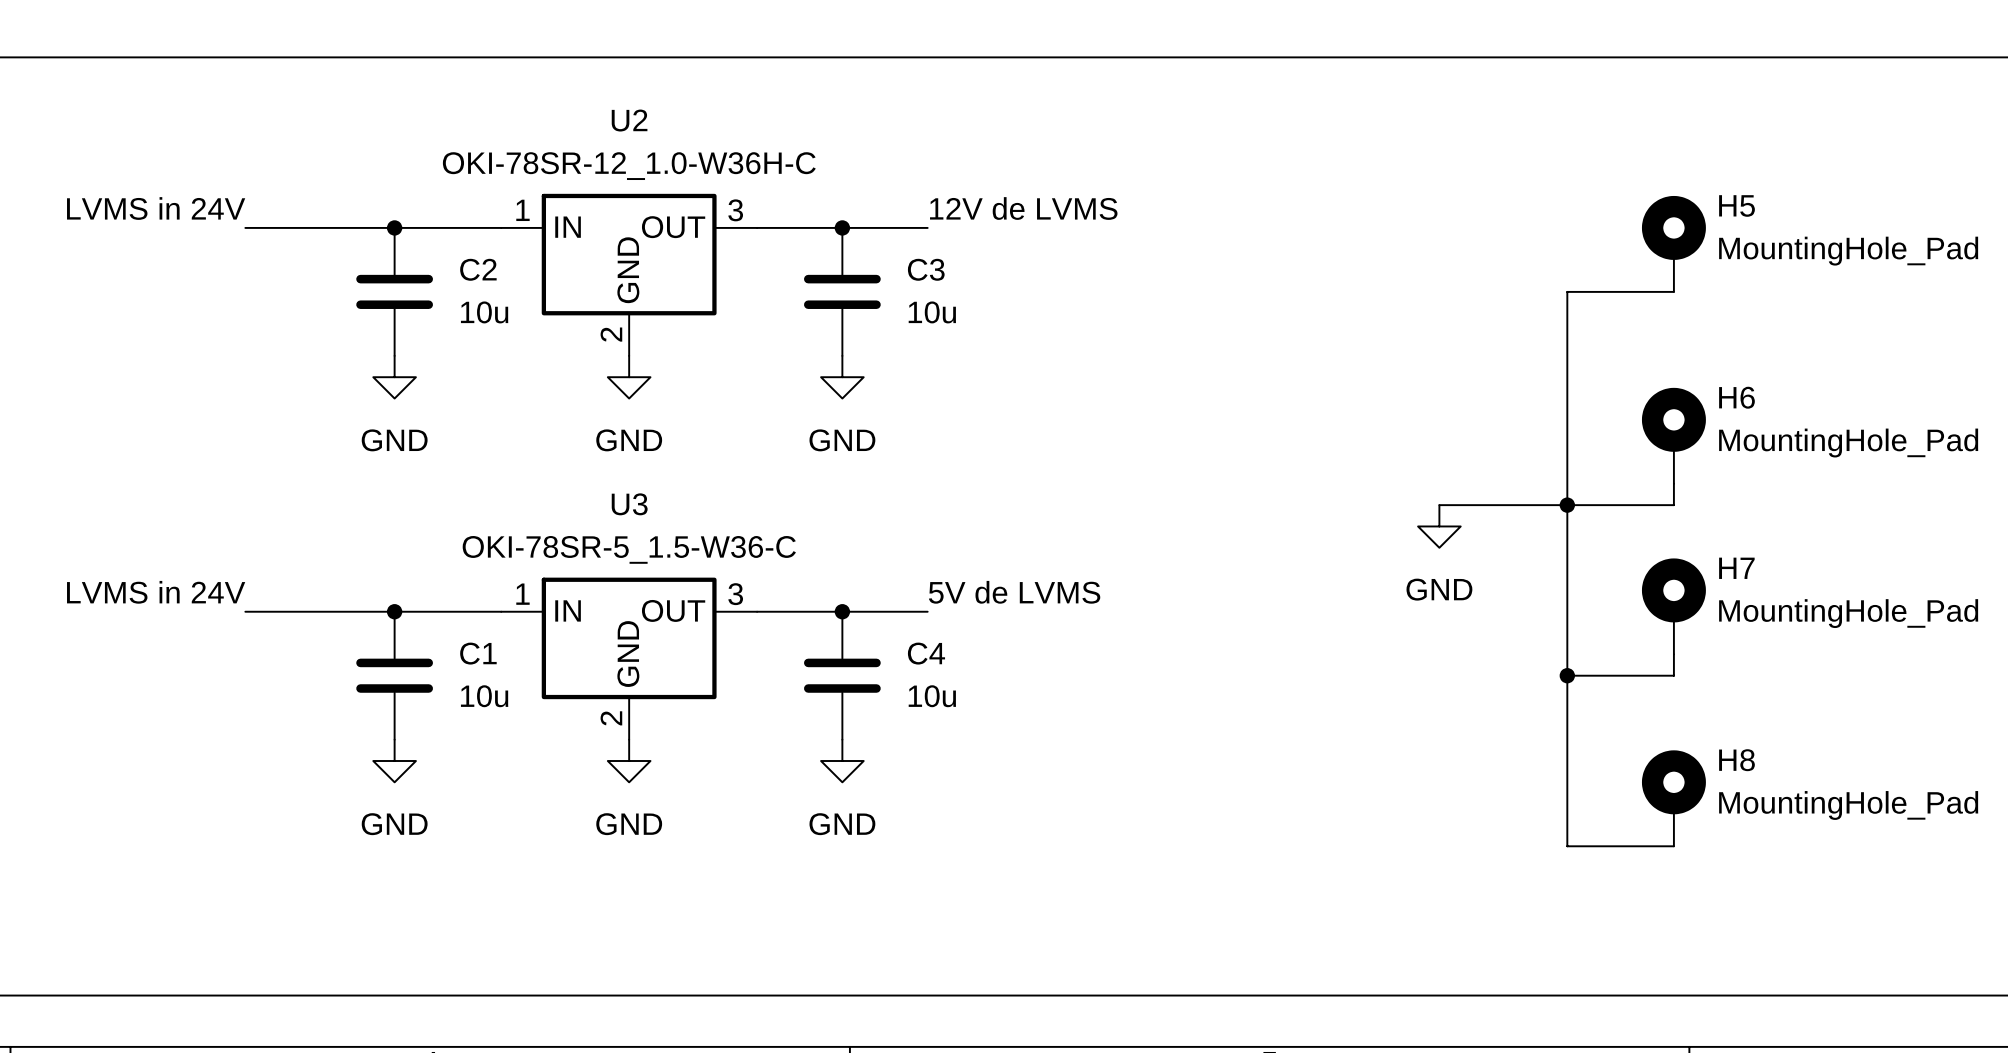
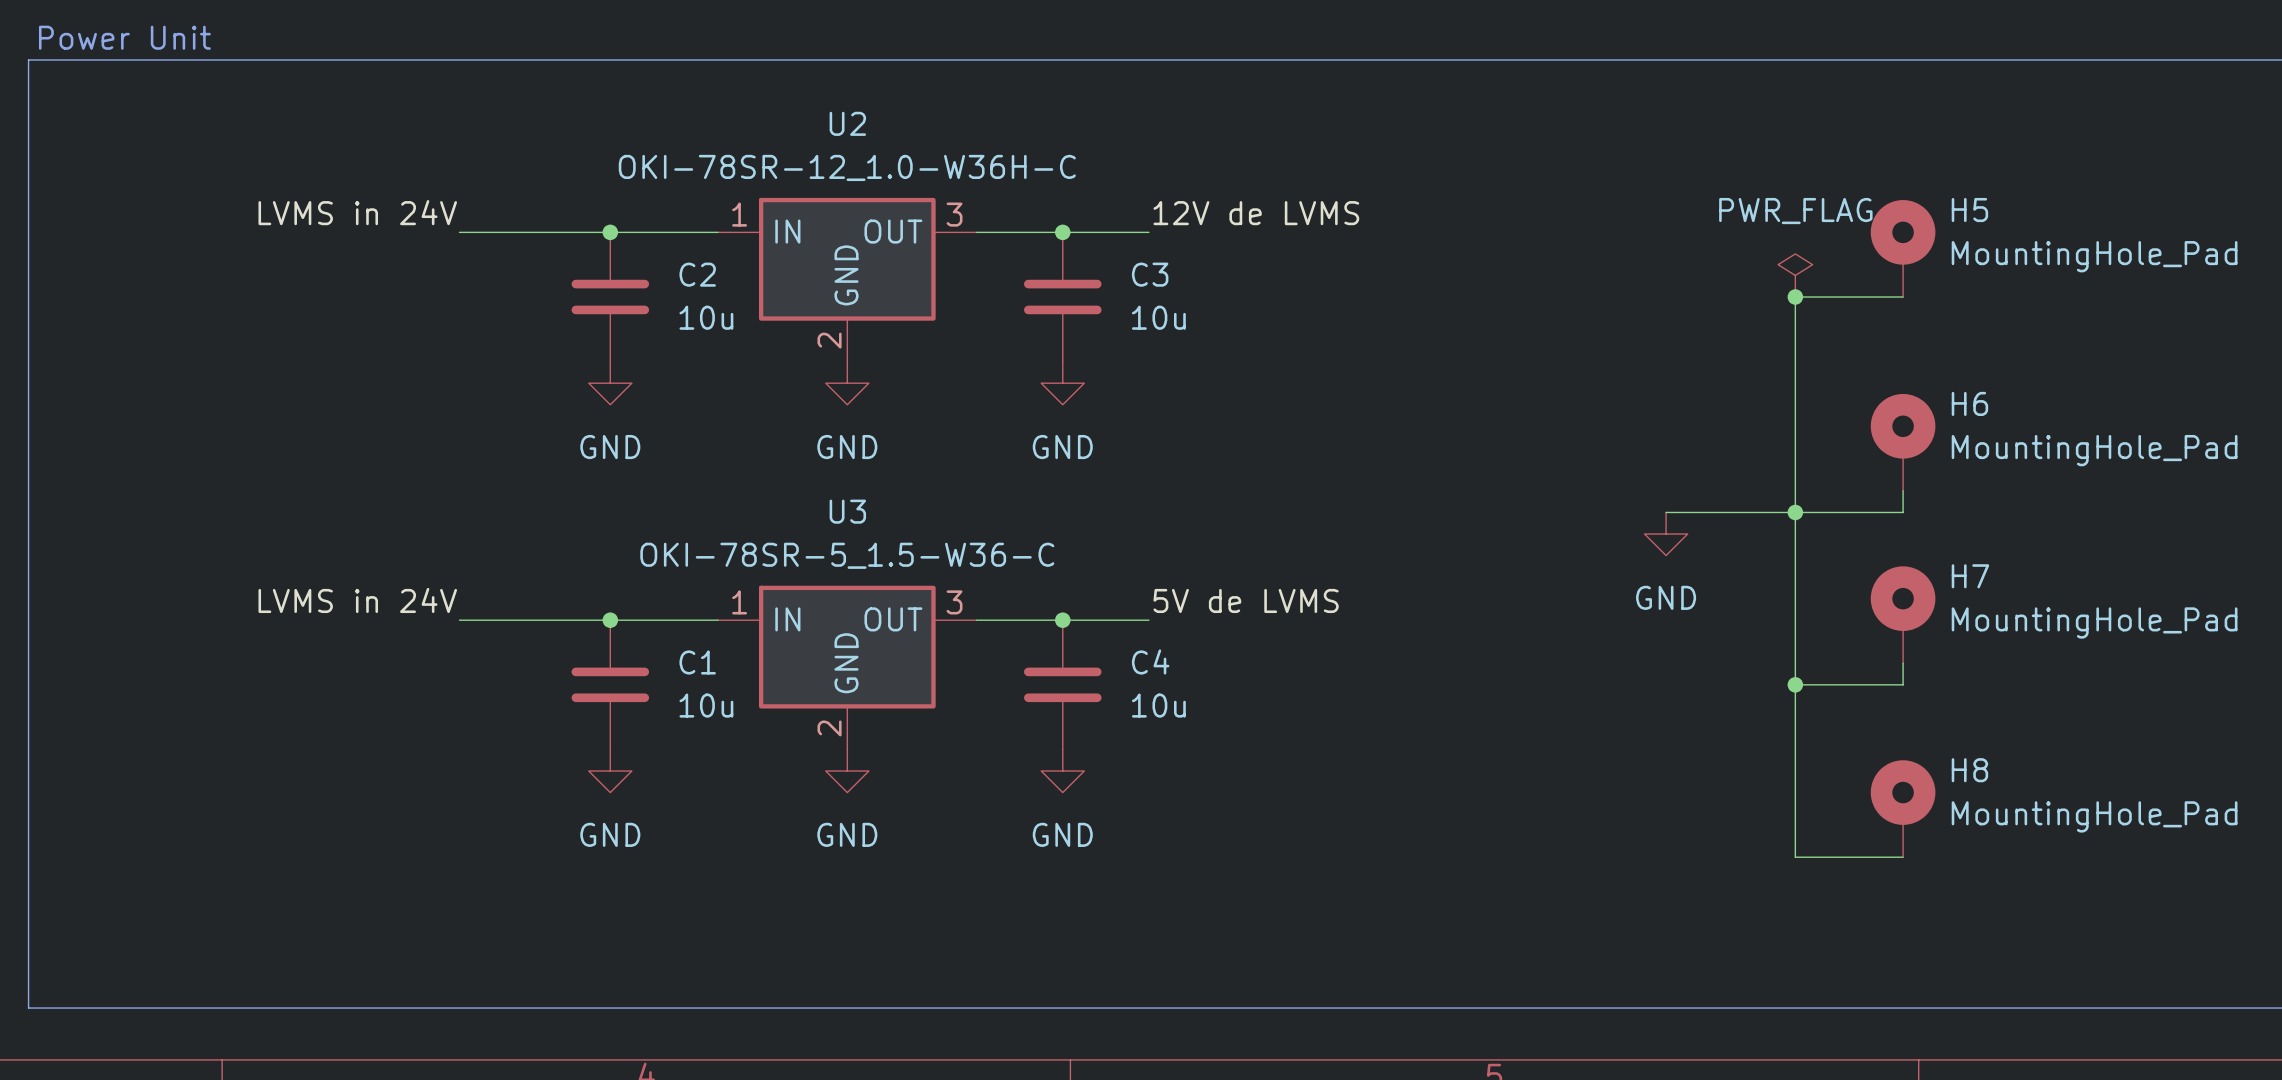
power symbol: none -> PWR_FLAG (1795, 275)
junction: none -> (1795, 297)

